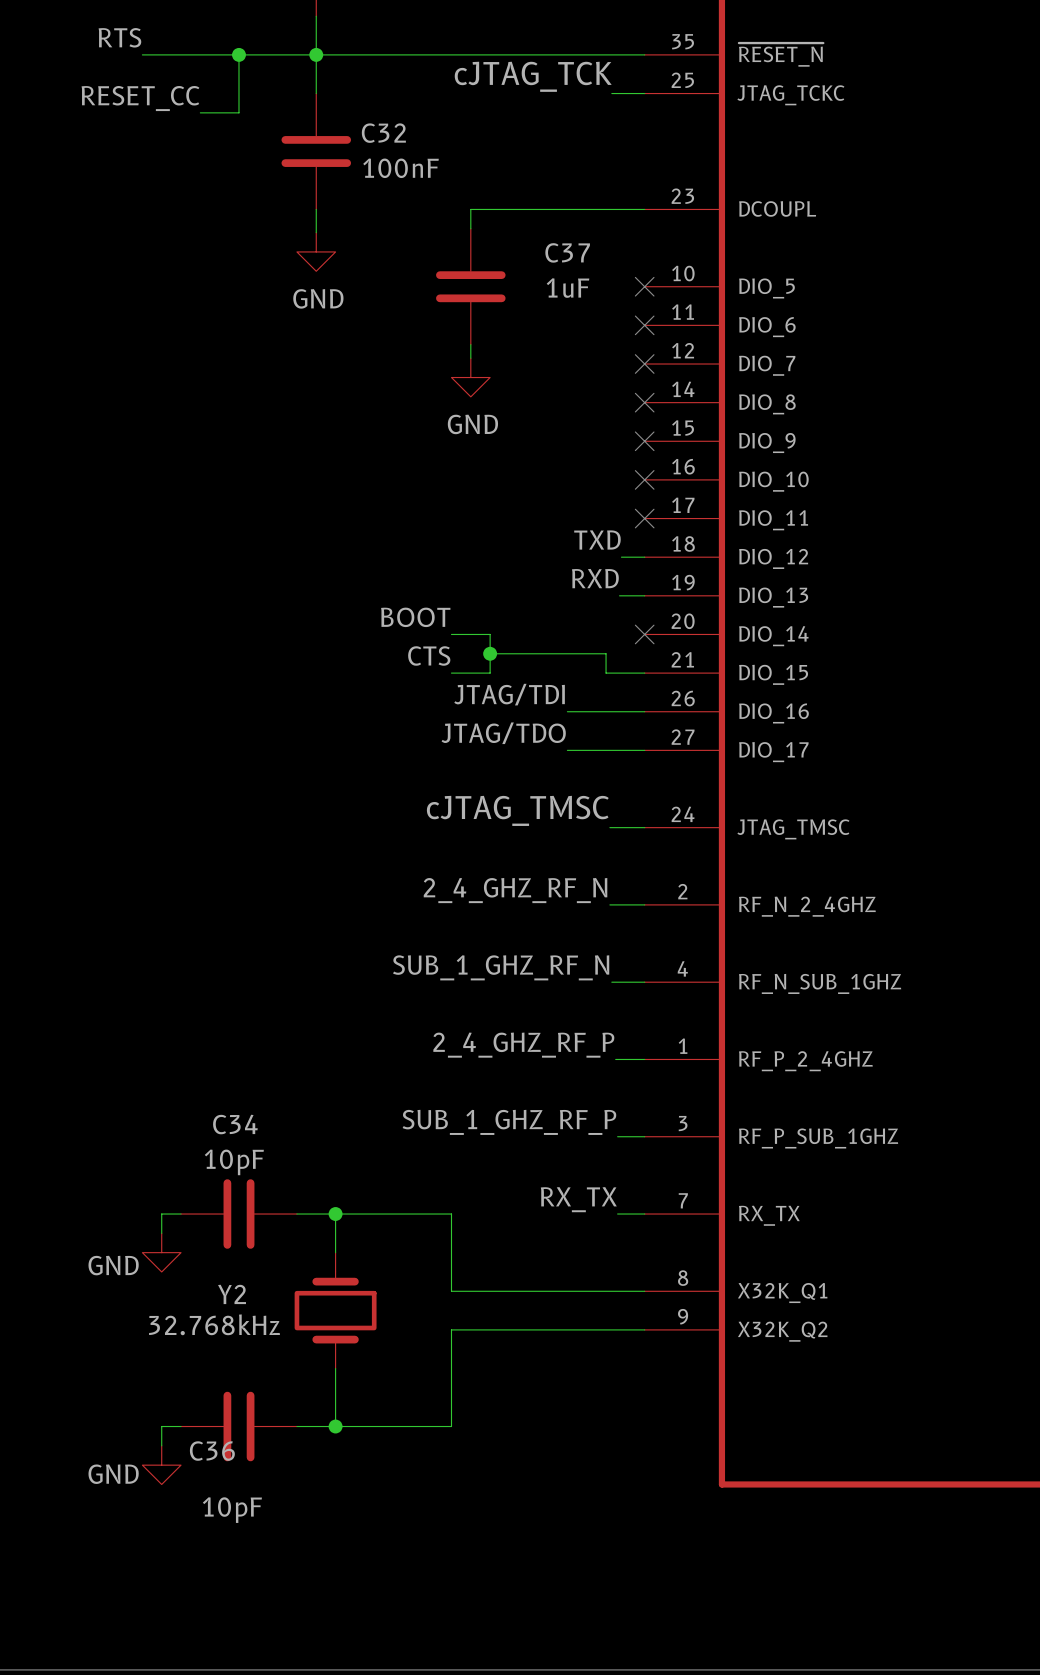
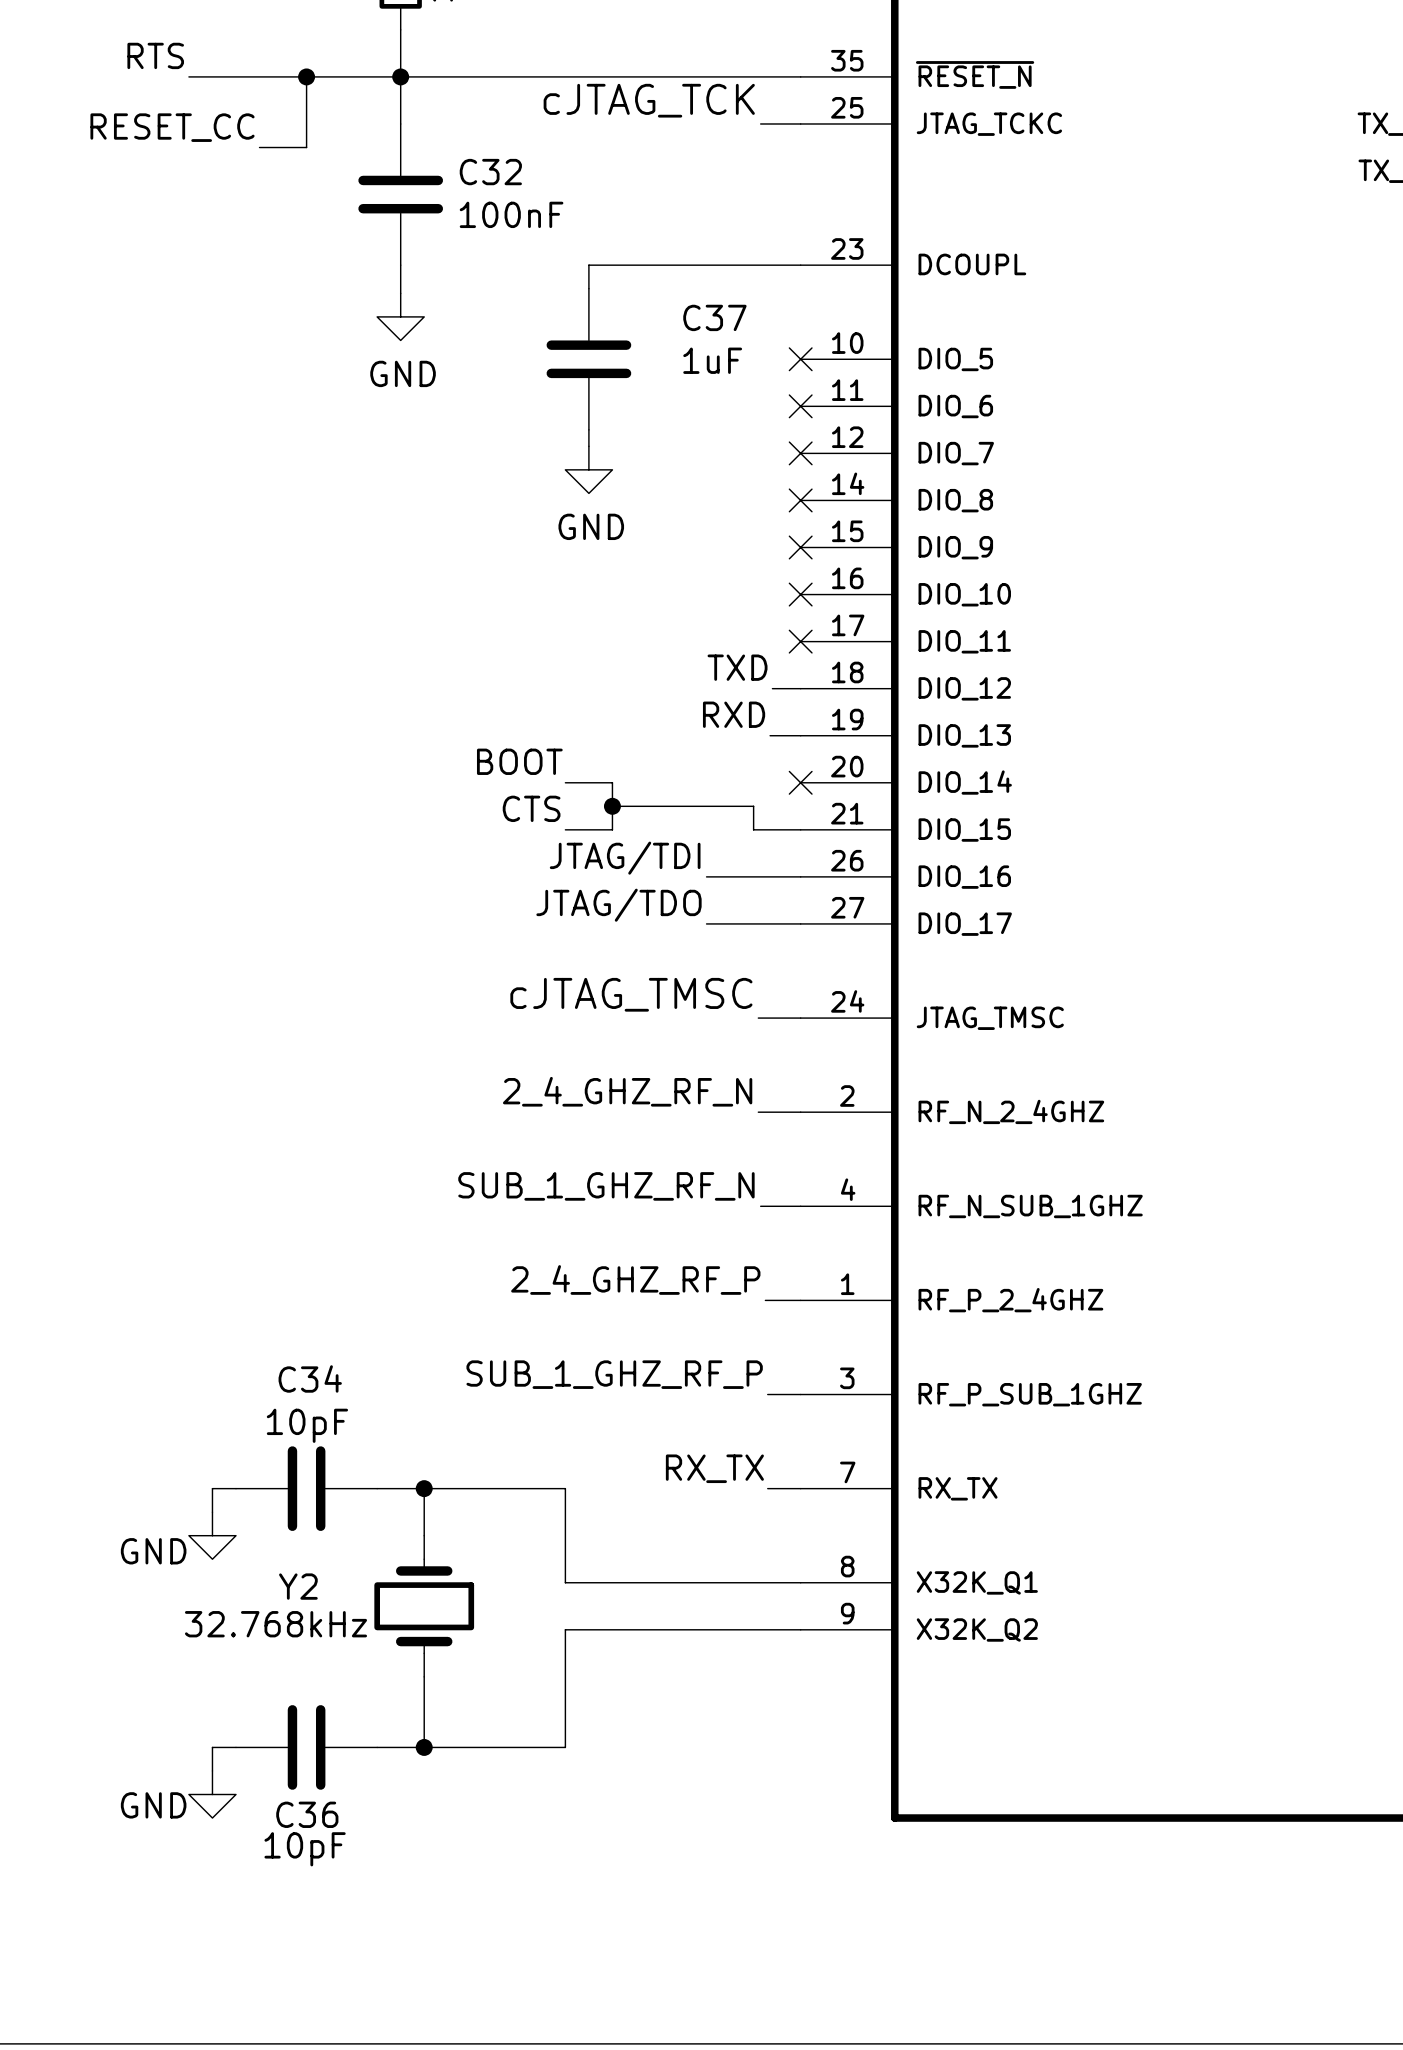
C36 name position: C36 (212, 1451) -> C36 (307, 1814)

